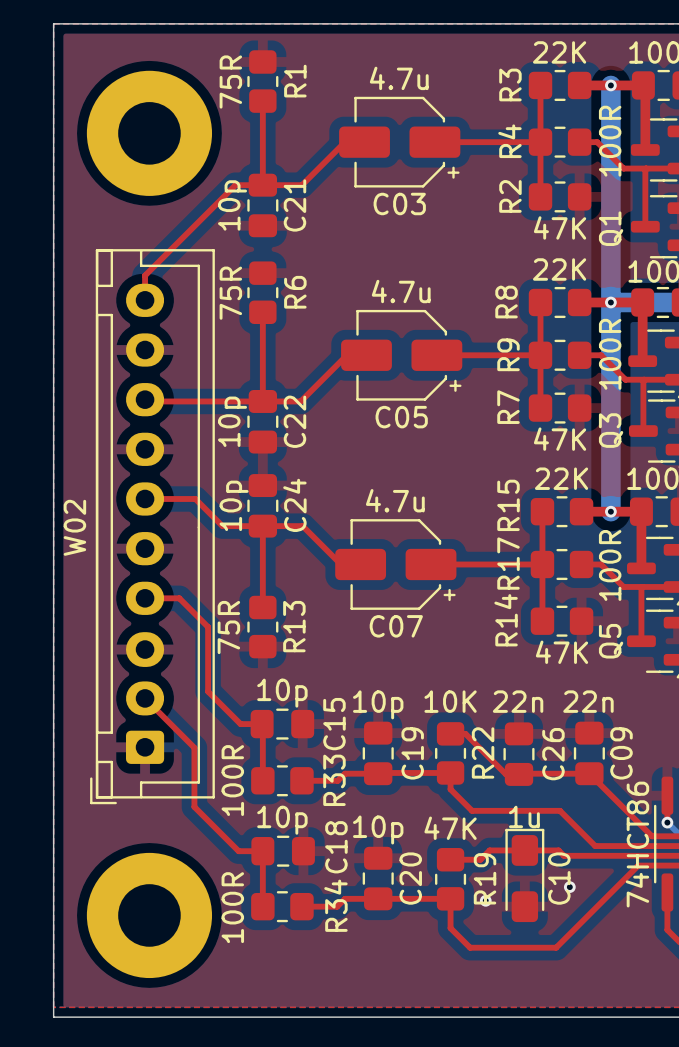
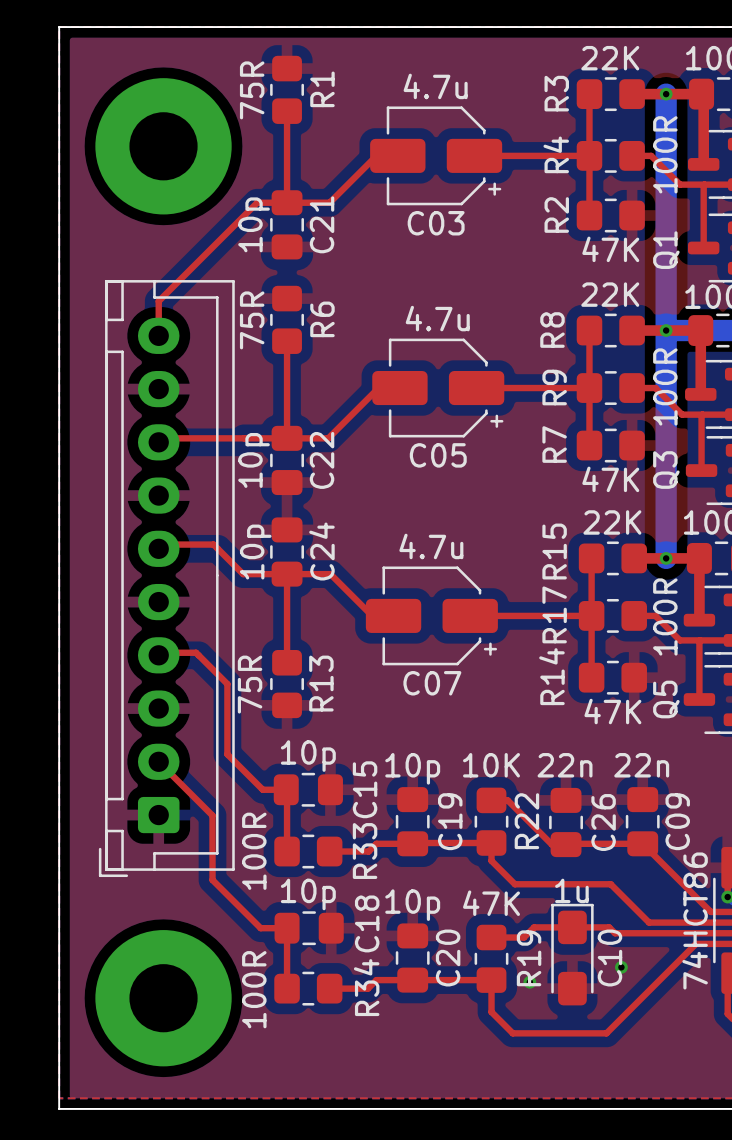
W02: (152, 526) -> none
part: none -> (166, 578)

